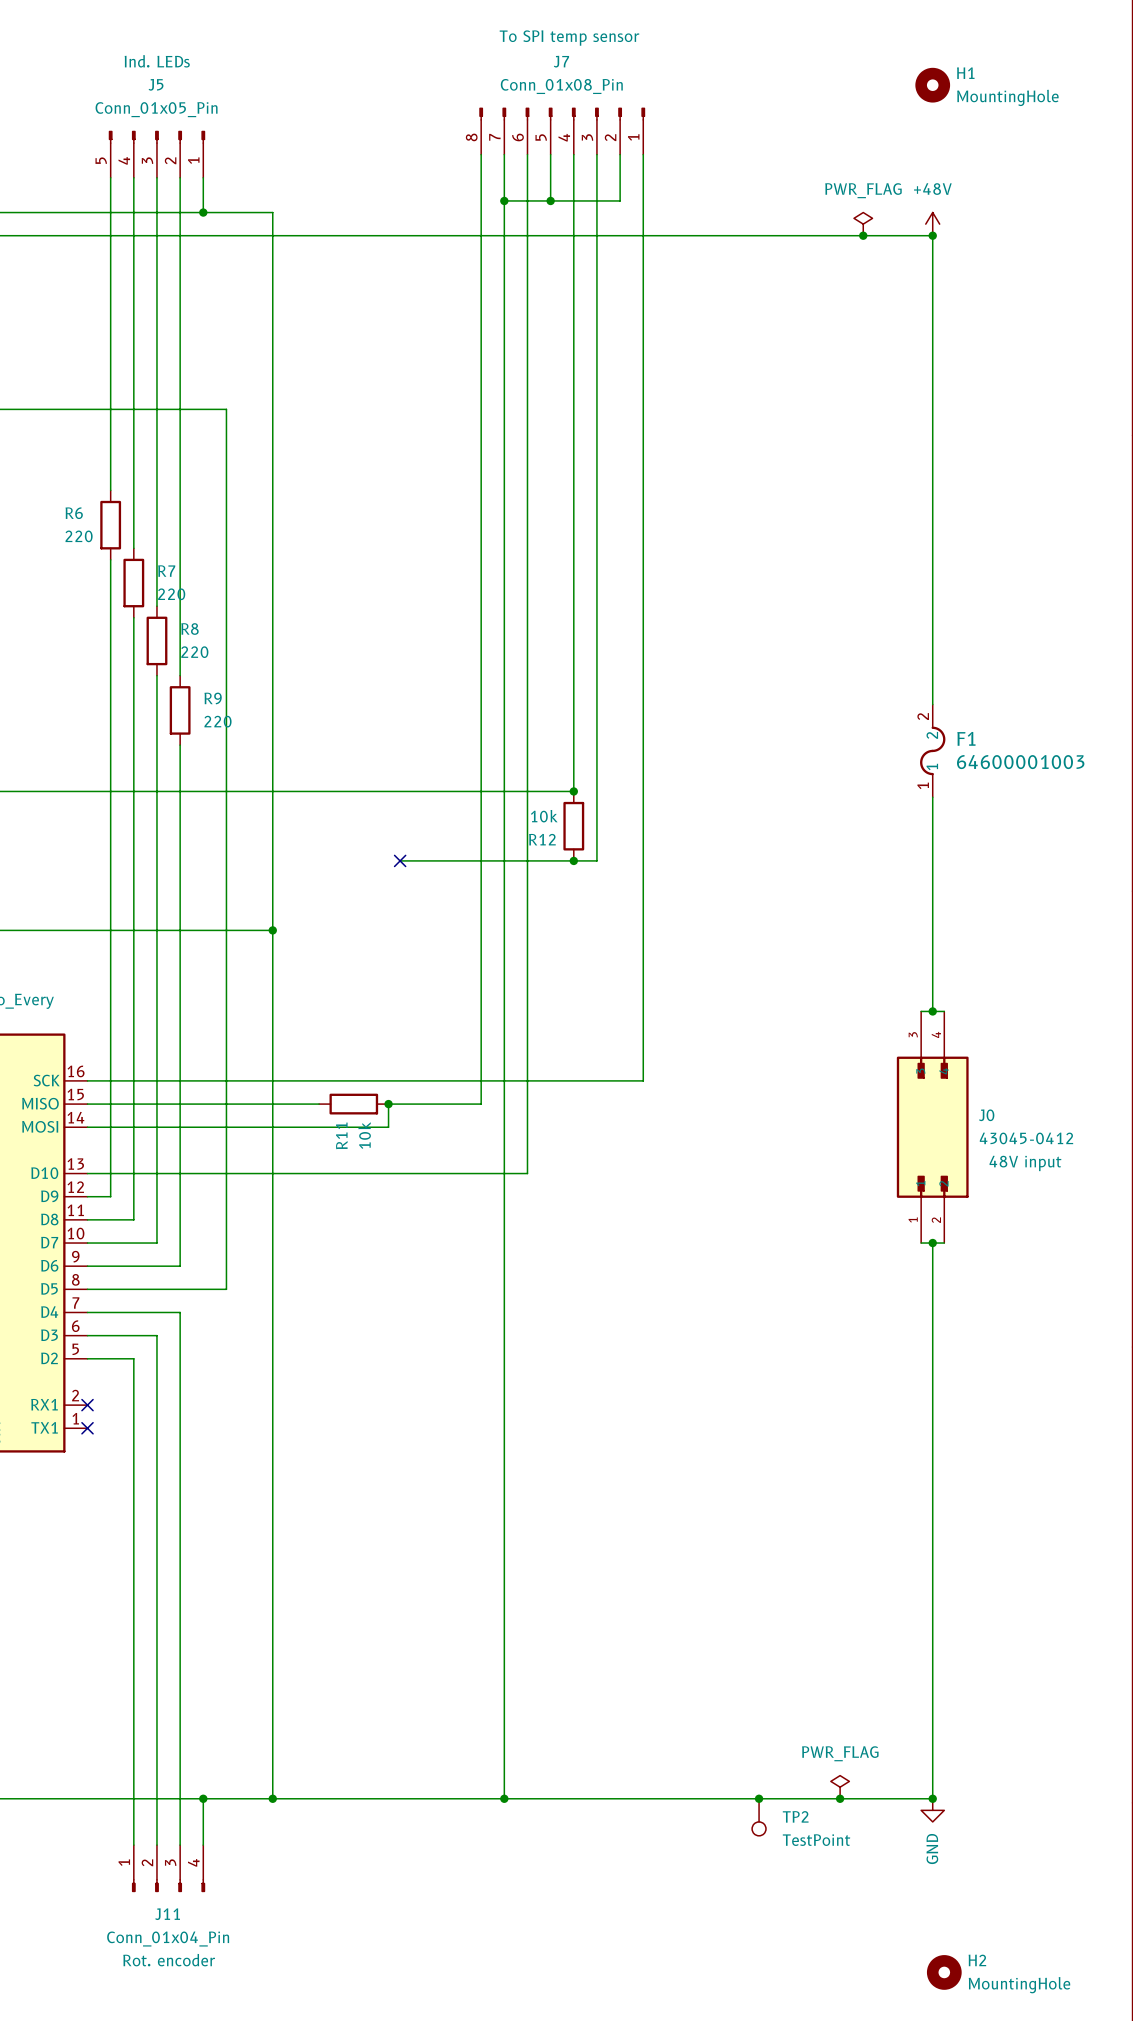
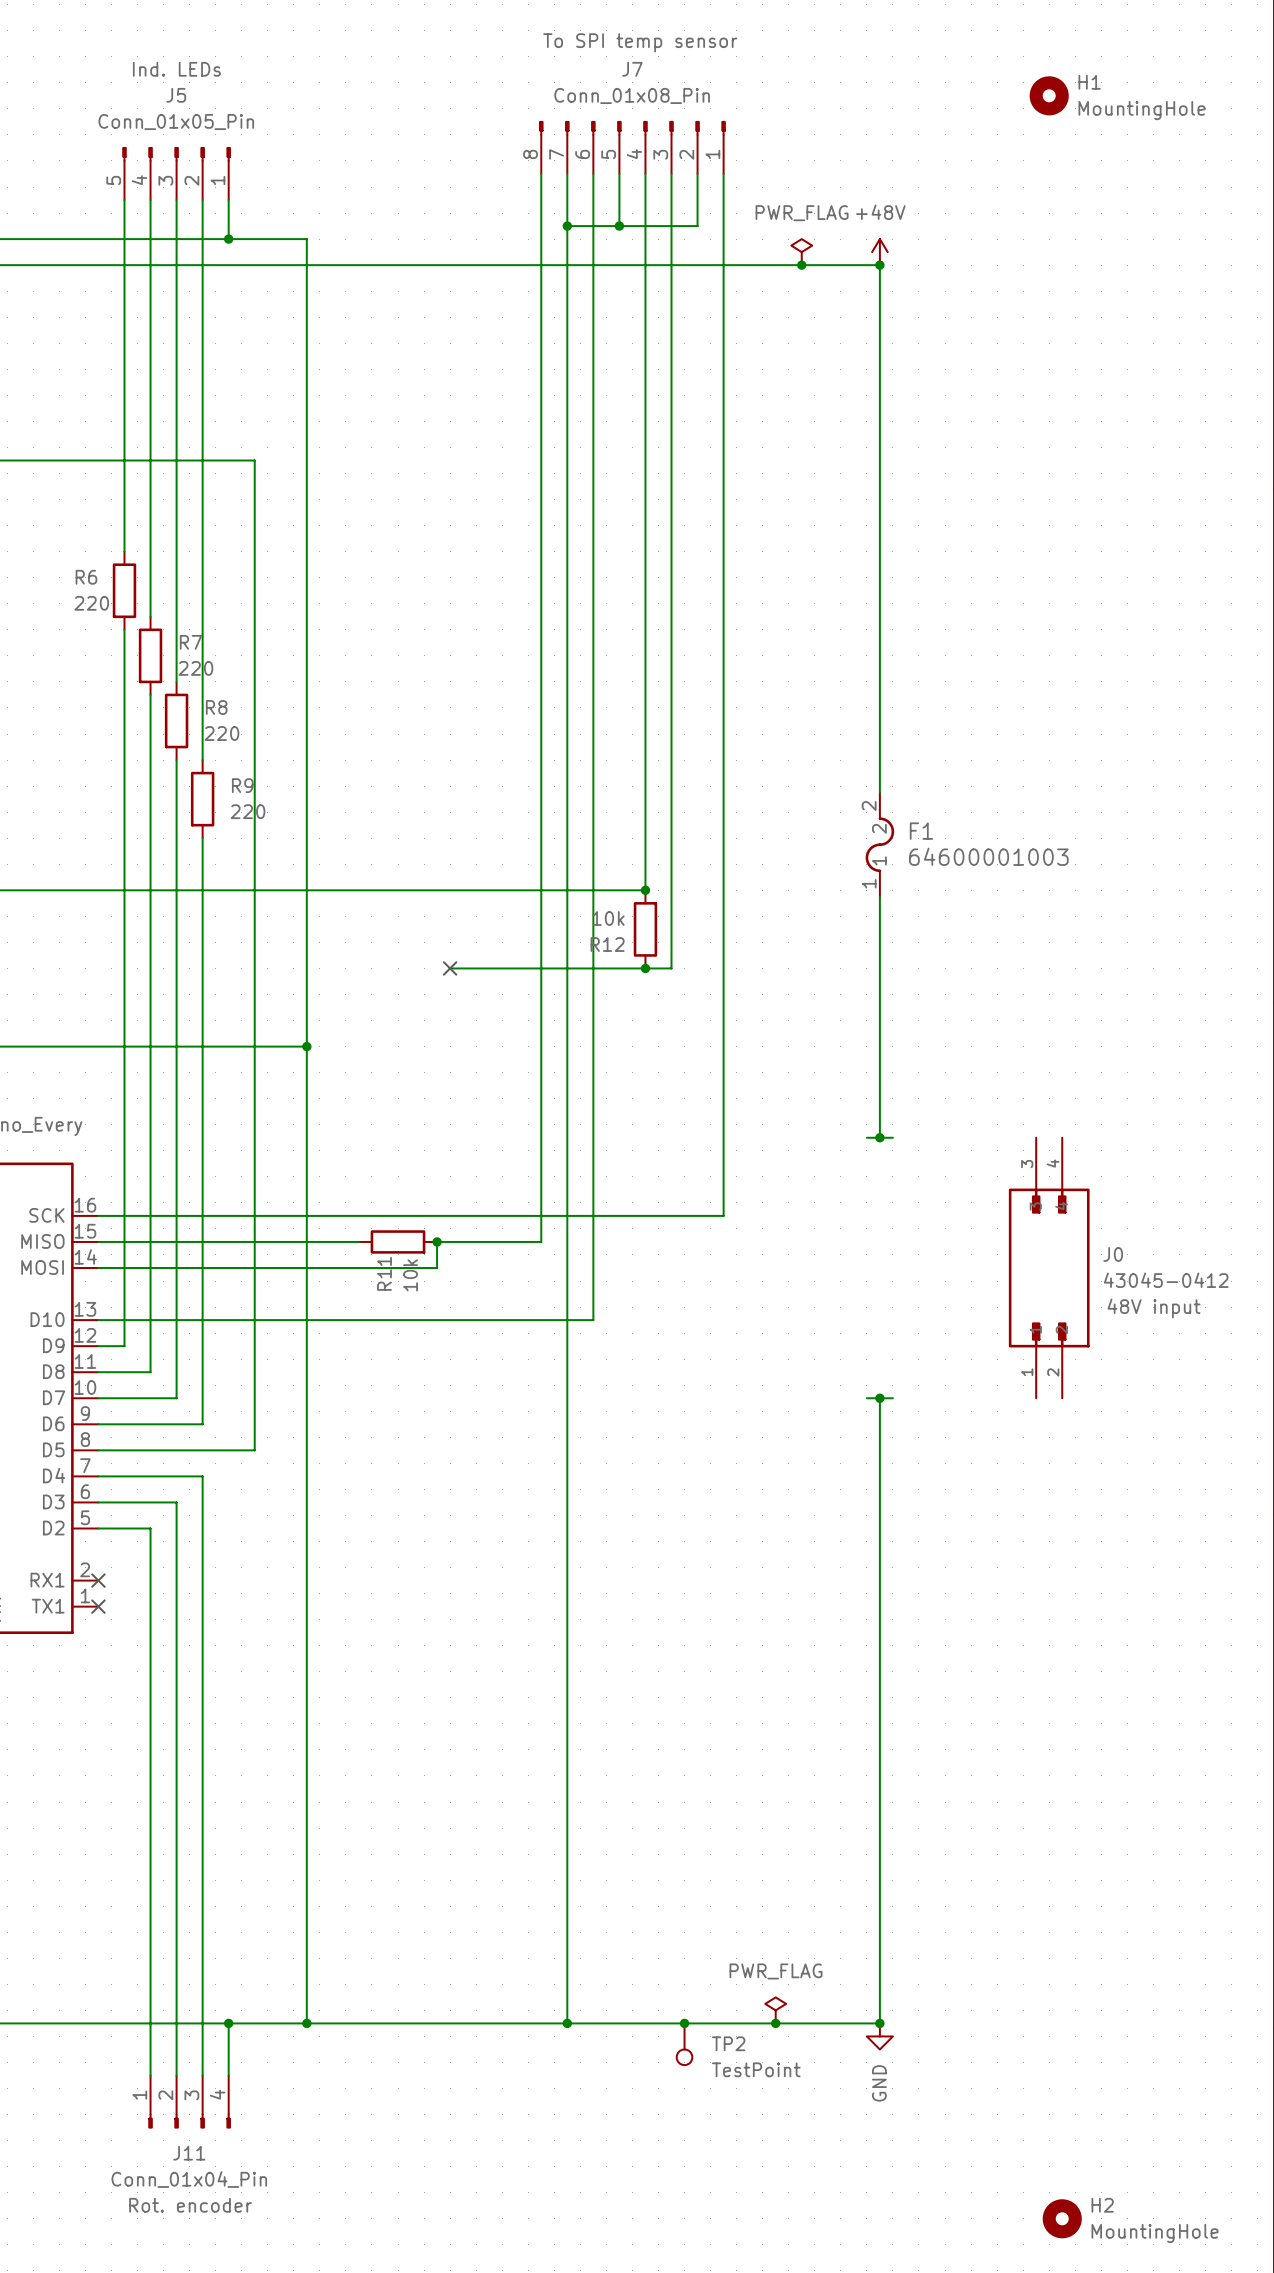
power symbol position: PWR_FLAG (863, 224) -> PWR_FLAG (801, 252)
power symbol position: +48V (932, 224) -> +48V (879, 252)
junction: none -> (801, 265)
wire: (782, 235) (932, 235) (932, 704) -> (879, 265) (879, 792)
junction: none -> (879, 265)
junction: (863, 235) -> none
junction: (932, 235) -> none
F1 position: (932, 750) -> (879, 844)
wire: (932, 797) (932, 1011) -> (879, 896) (879, 1137)
junction: none -> (879, 1137)
wire: (921, 1011) (944, 1011) -> (866, 1137) (892, 1137)
junction: (932, 1011) -> none
junction: none -> (879, 1398)
wire: (921, 1243) (944, 1243) -> (866, 1398) (892, 1398)
wire: (932, 1243) (932, 1798) (782, 1798) -> (879, 1398) (879, 2023)
junction: (932, 1243) -> none
power symbol position: PWR_FLAG (840, 1787) -> PWR_FLAG (775, 2010)
junction: none -> (684, 2023)
junction: none -> (775, 2023)
junction position: (759, 1798) -> (879, 2023)
junction: (840, 1798) -> none
junction: (932, 1798) -> none
power symbol position: GND (932, 1810) -> GND (879, 2036)
TP2 position: (759, 1817) -> (684, 2044)

